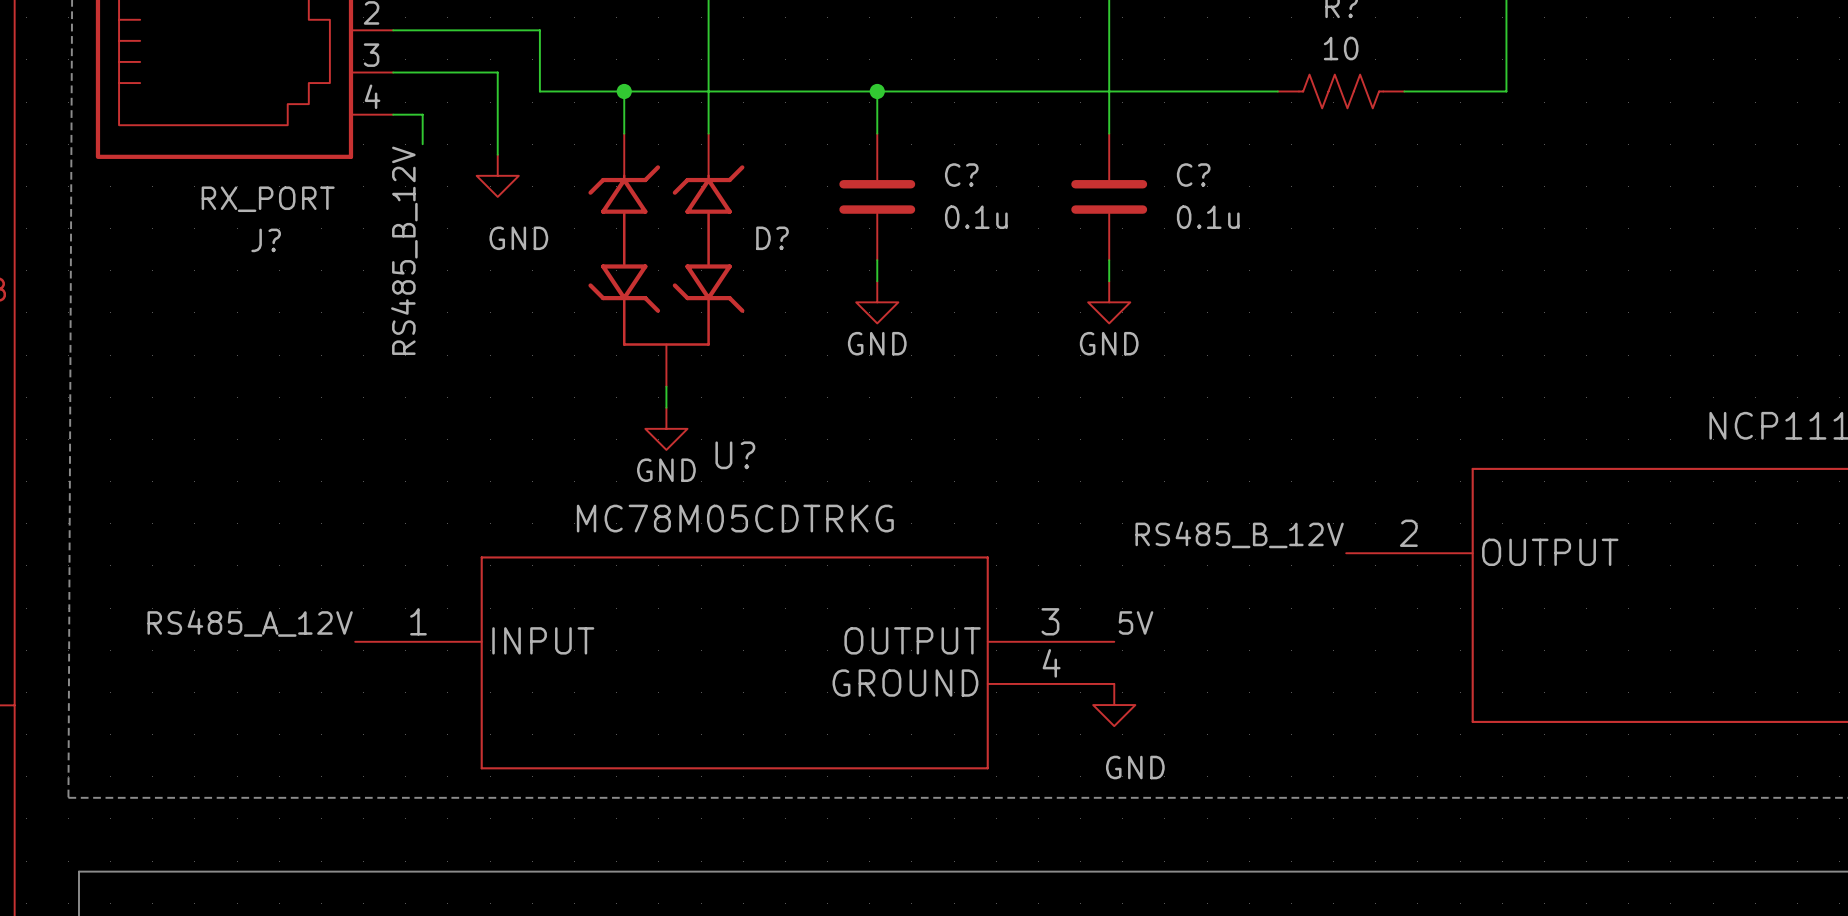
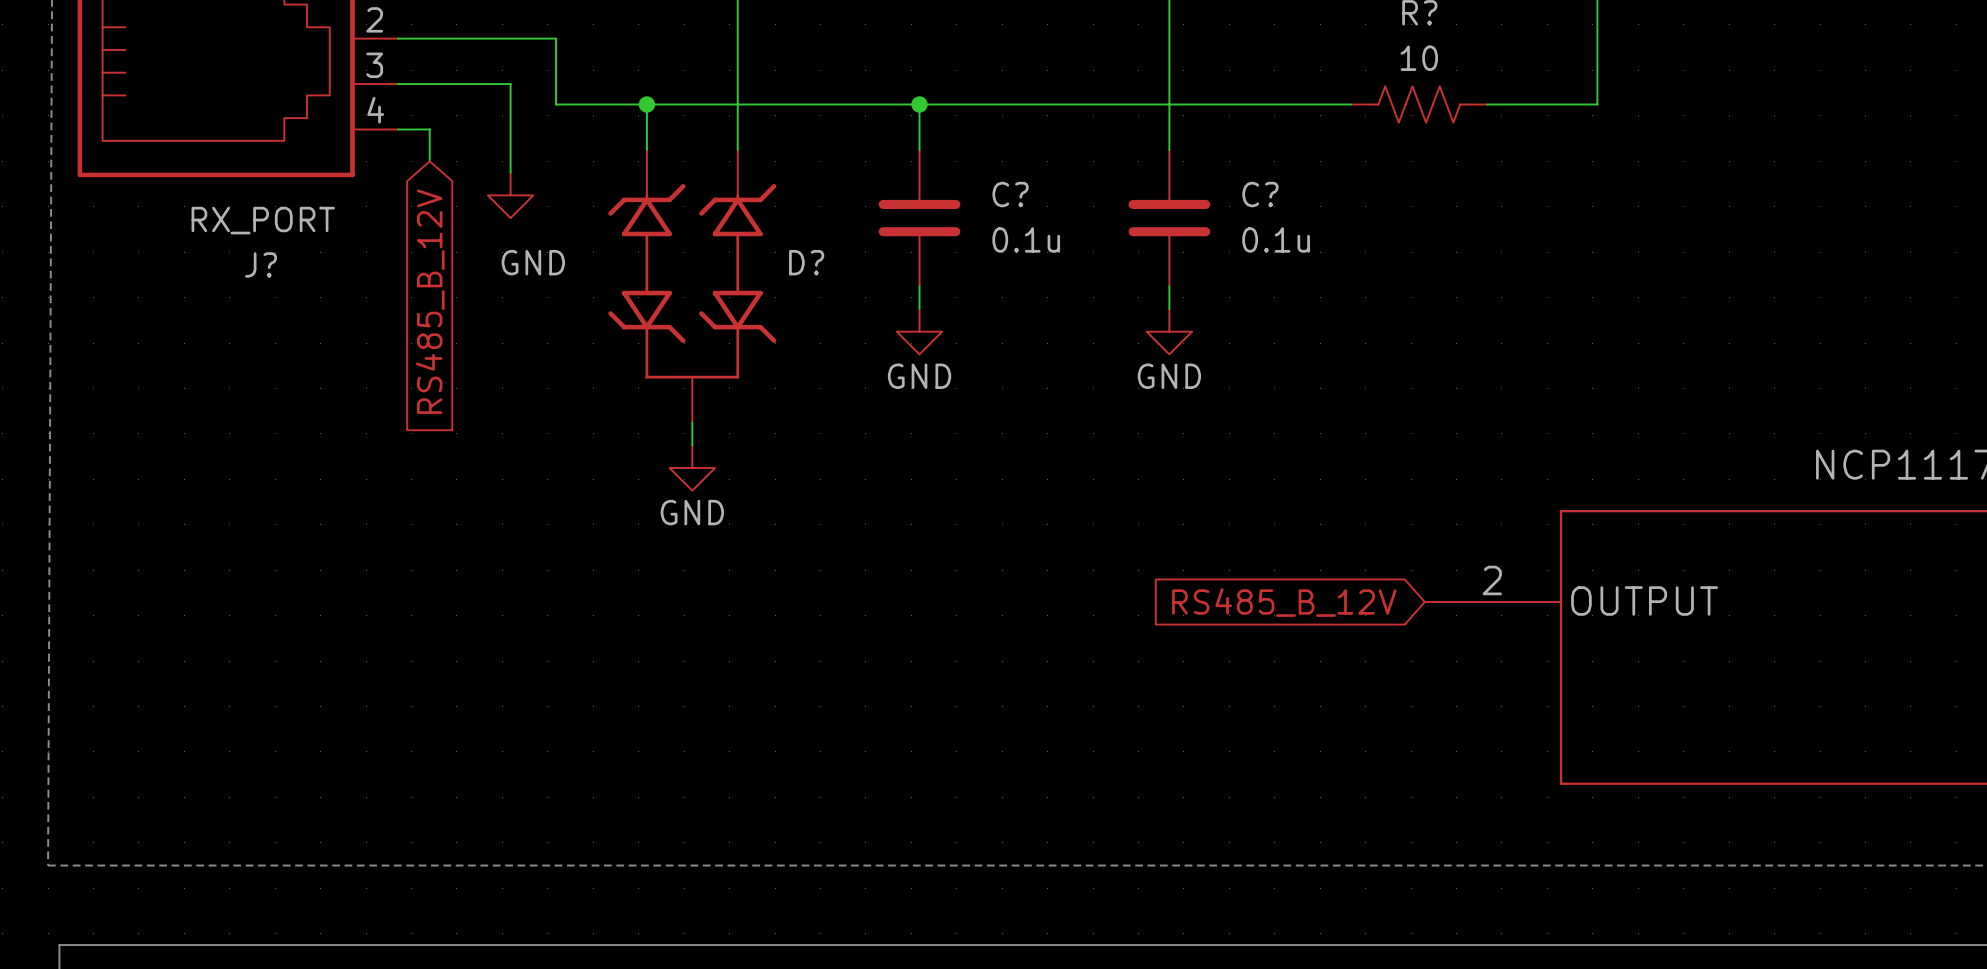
label: RS485_B_12V (404, 250) -> none
global label: none -> RS485_B_12V (430, 301)
label: RS485_B_12V (1239, 534) -> none
global label: none -> RS485_B_12V (1284, 602)
label: 5V (1136, 622) -> none
label: RS485_A_12V (250, 623) -> none
U?: MC78M05CDTRKG (734, 662) -> none
power symbol: GND (1114, 705) -> none

